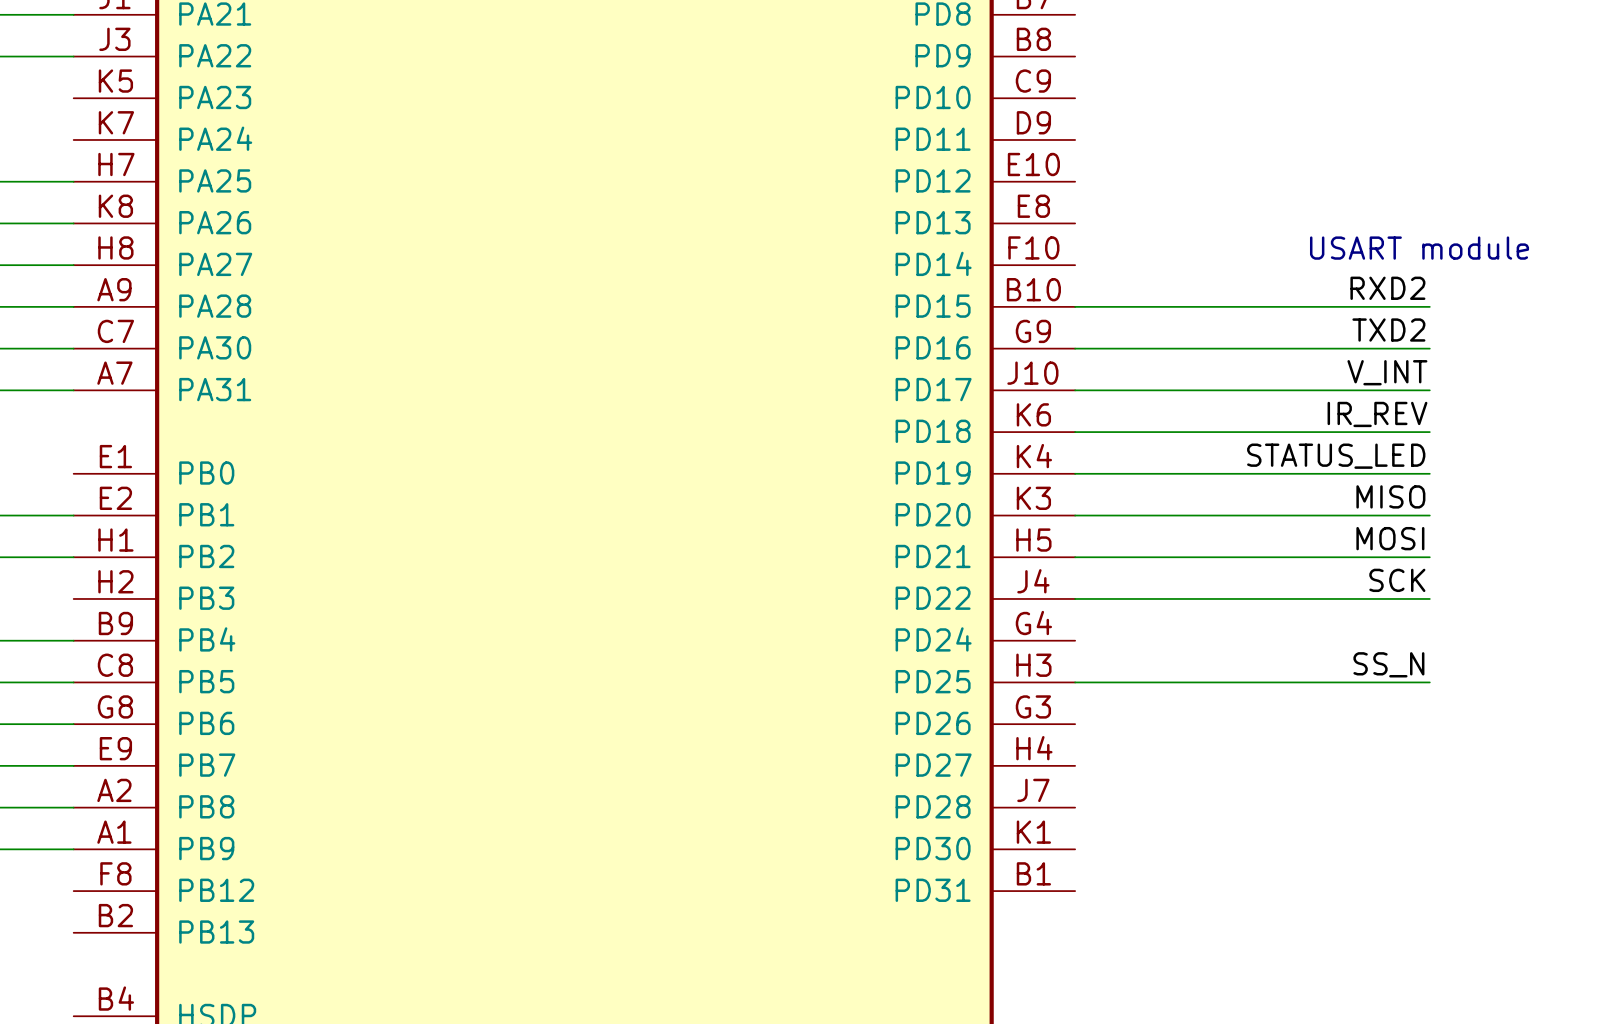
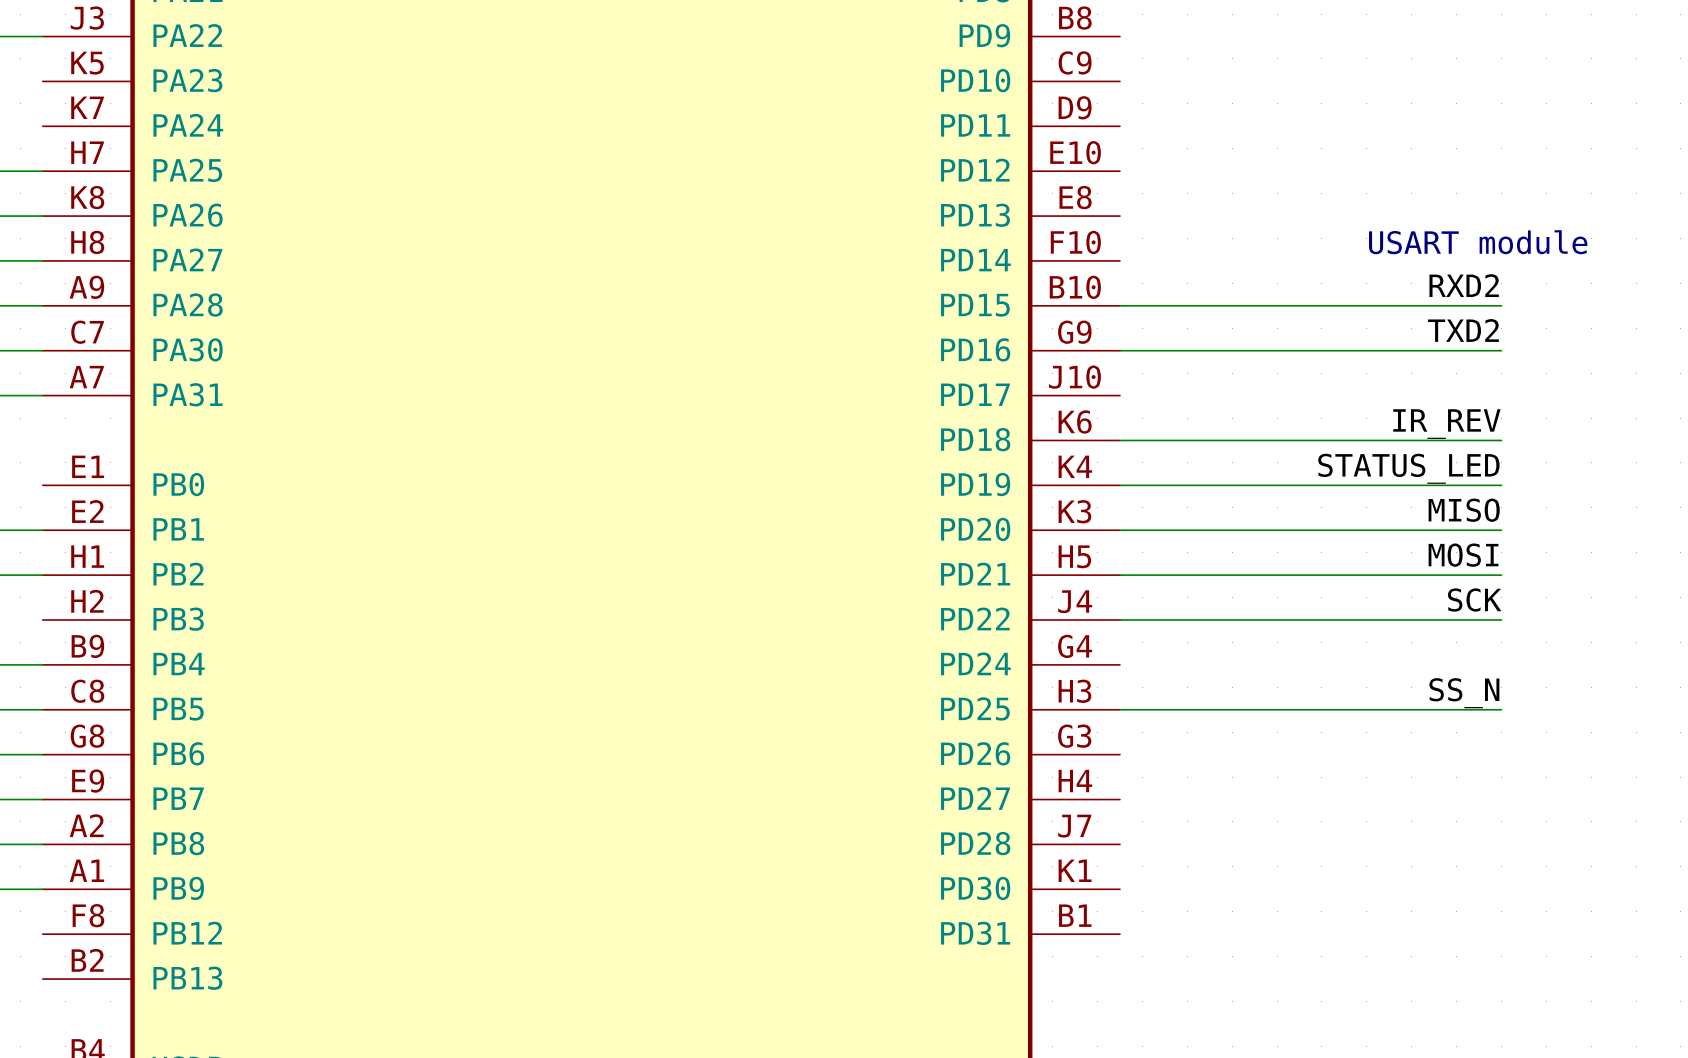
label: V_INT (1387, 372) -> none
wire: (1075, 390) (1429, 390) -> none

